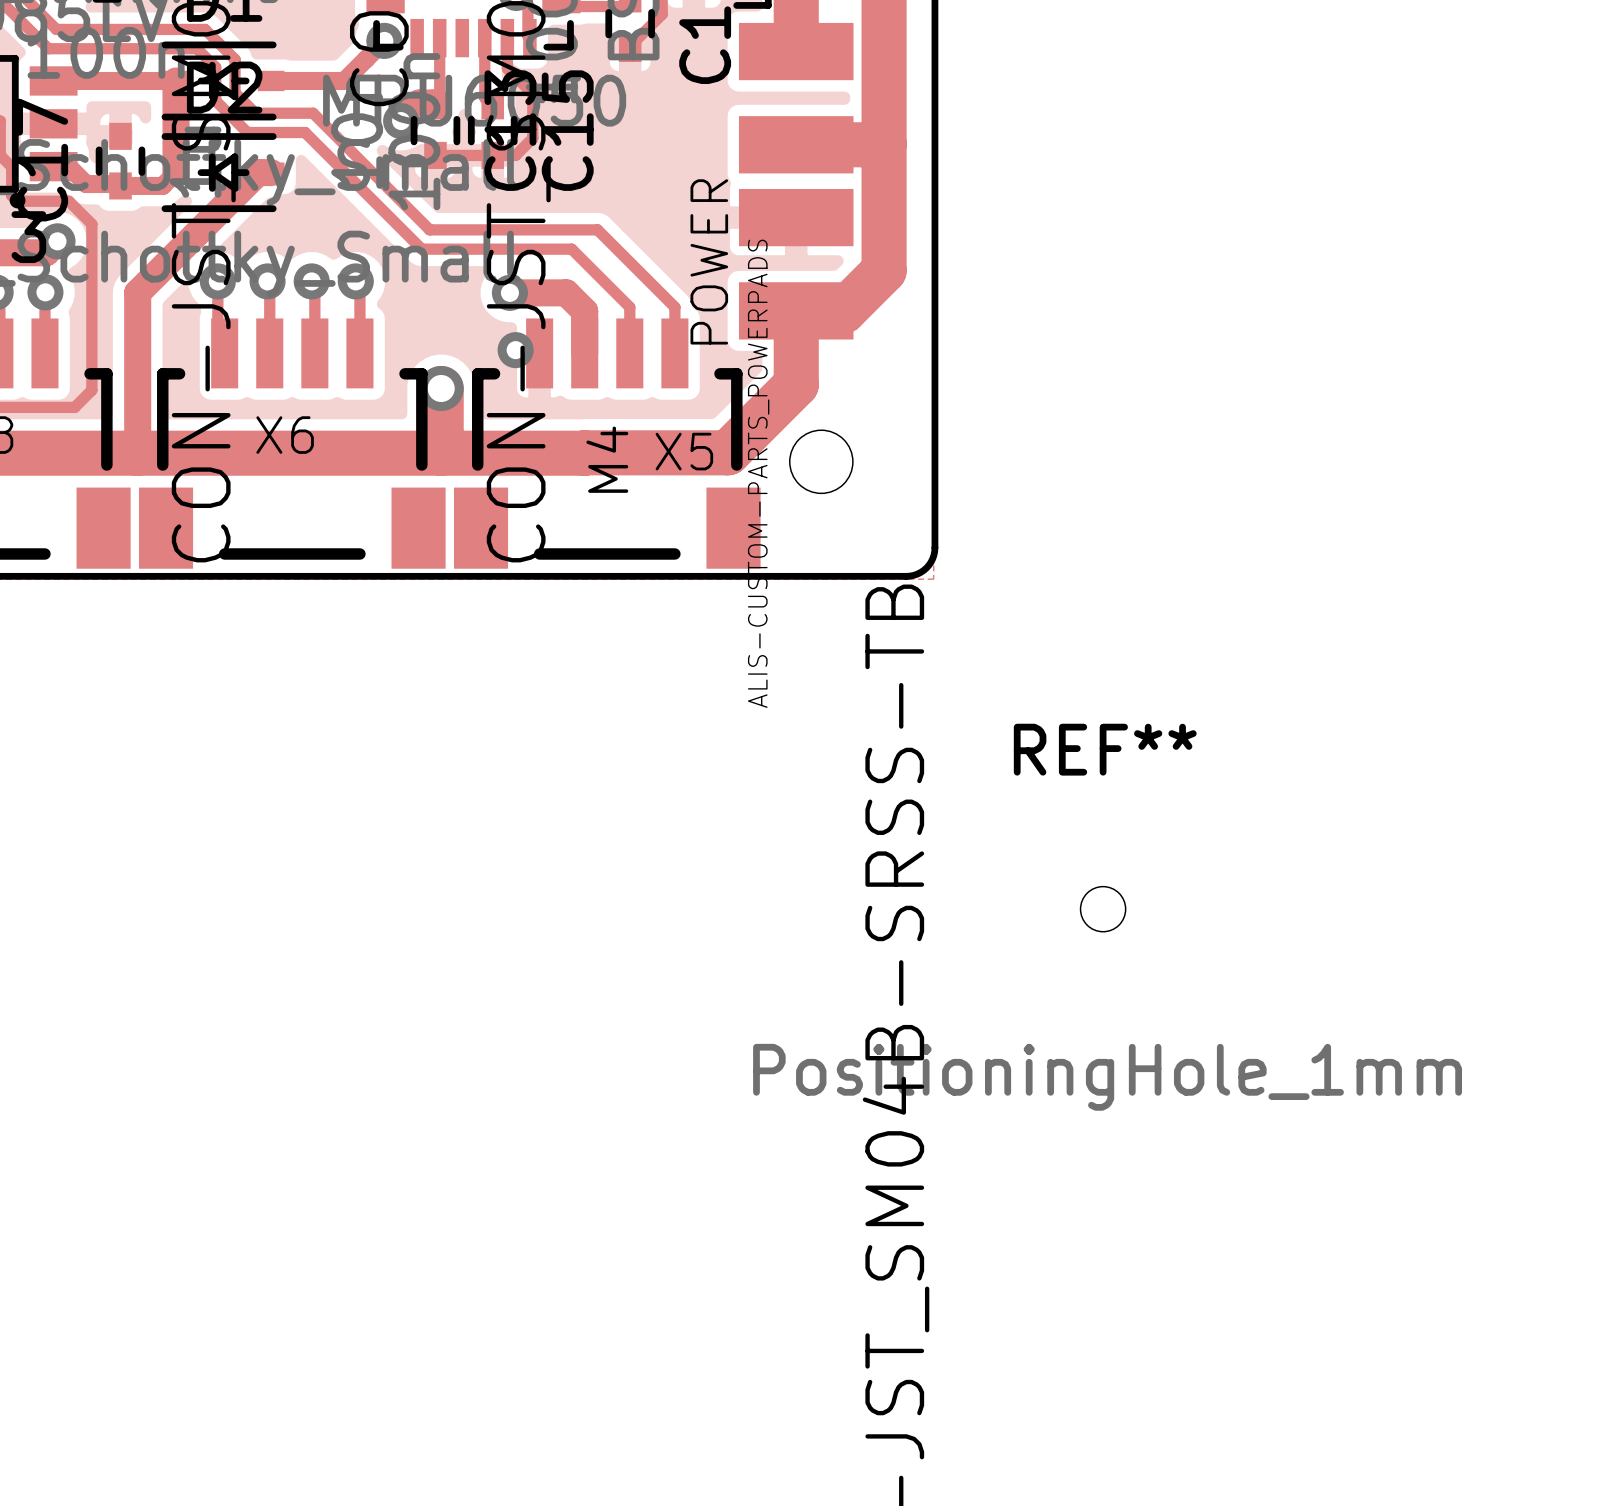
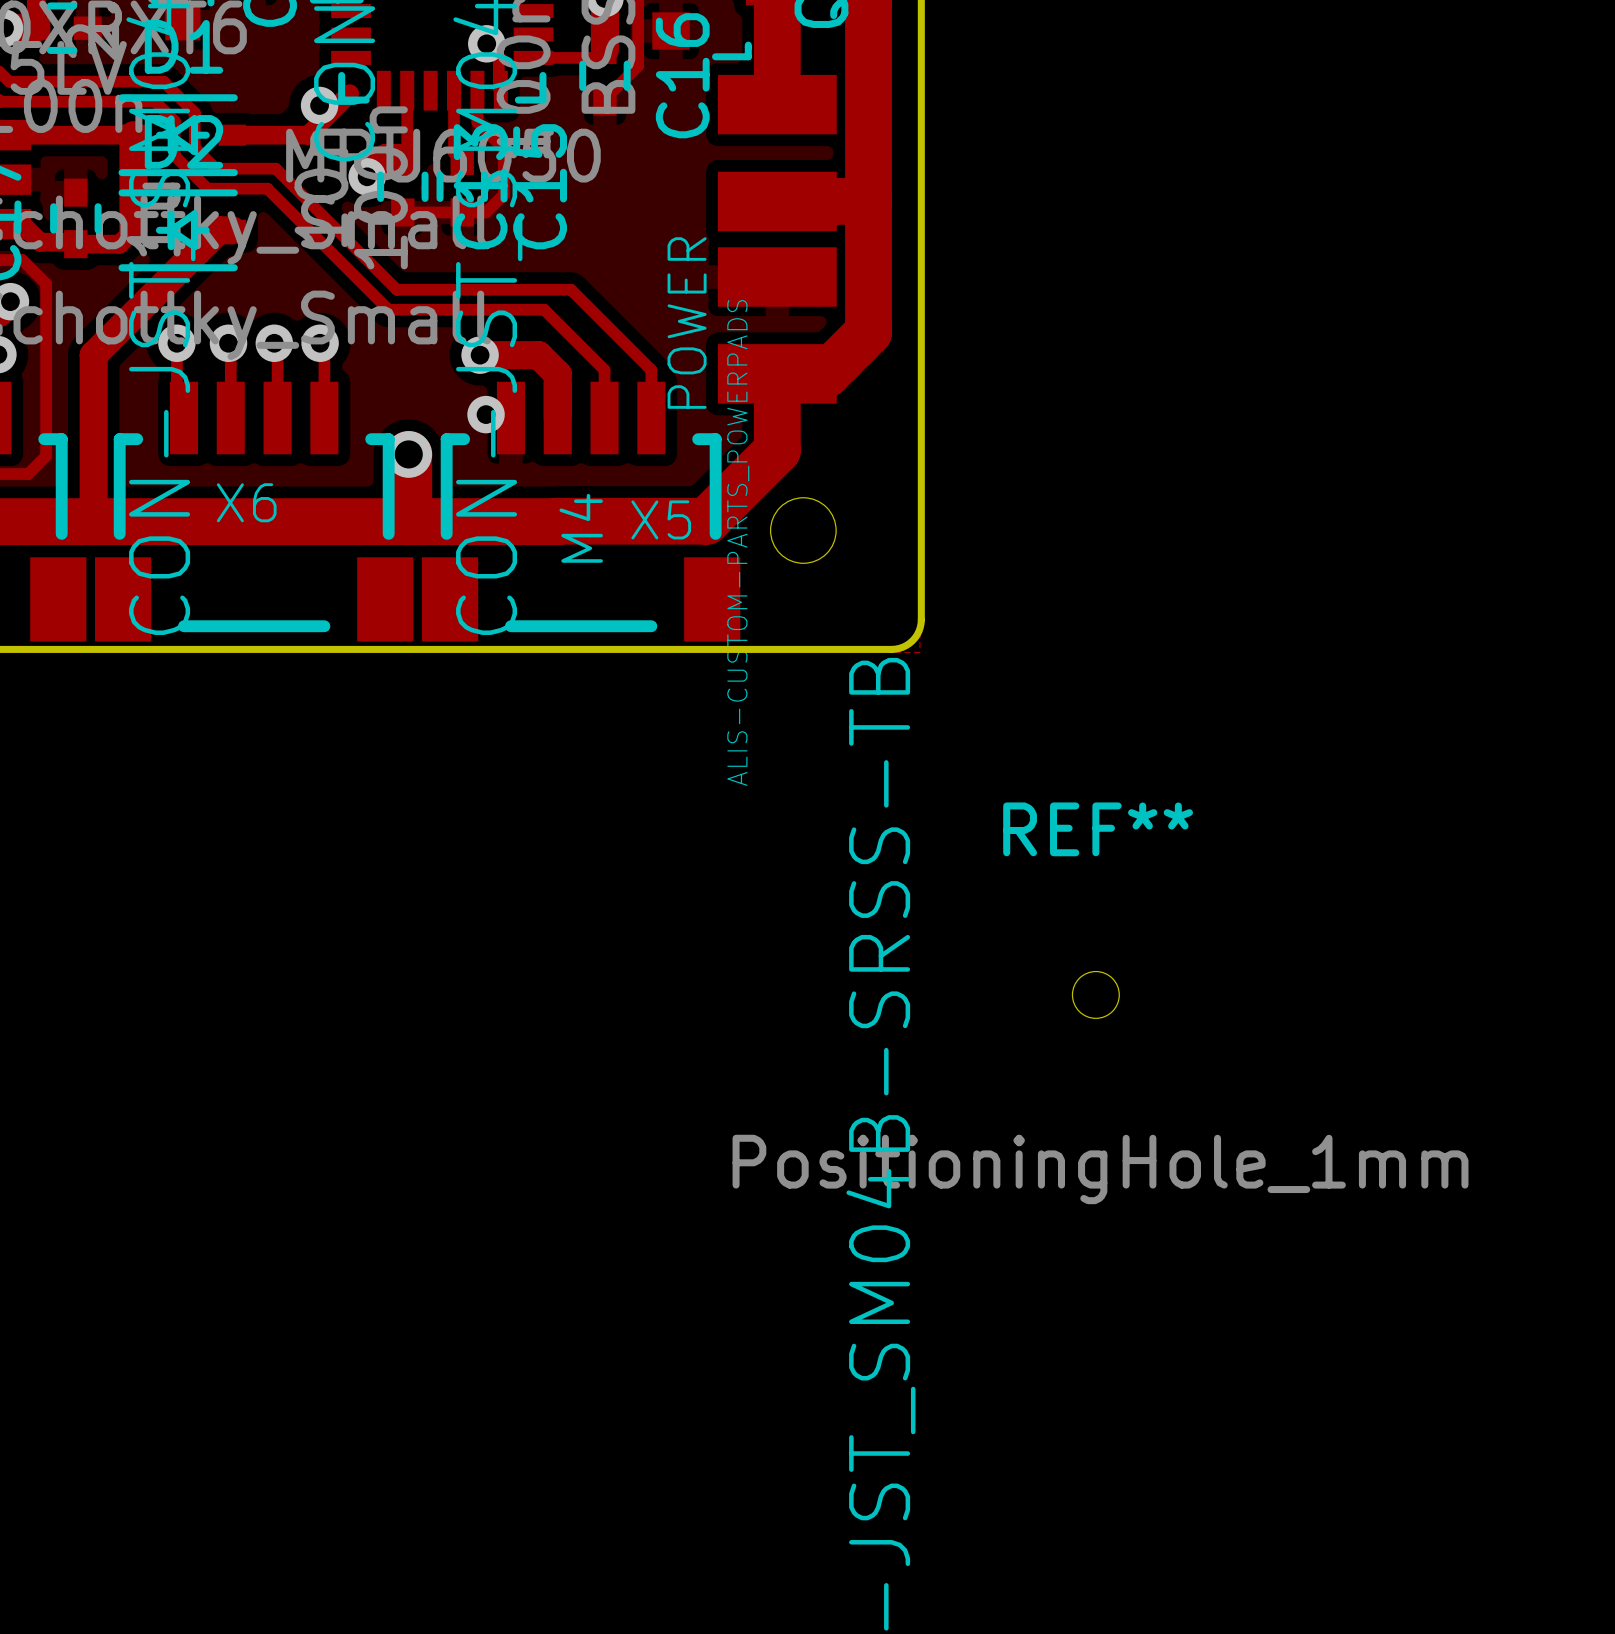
via position: (384, 40) -> (319, 105)

